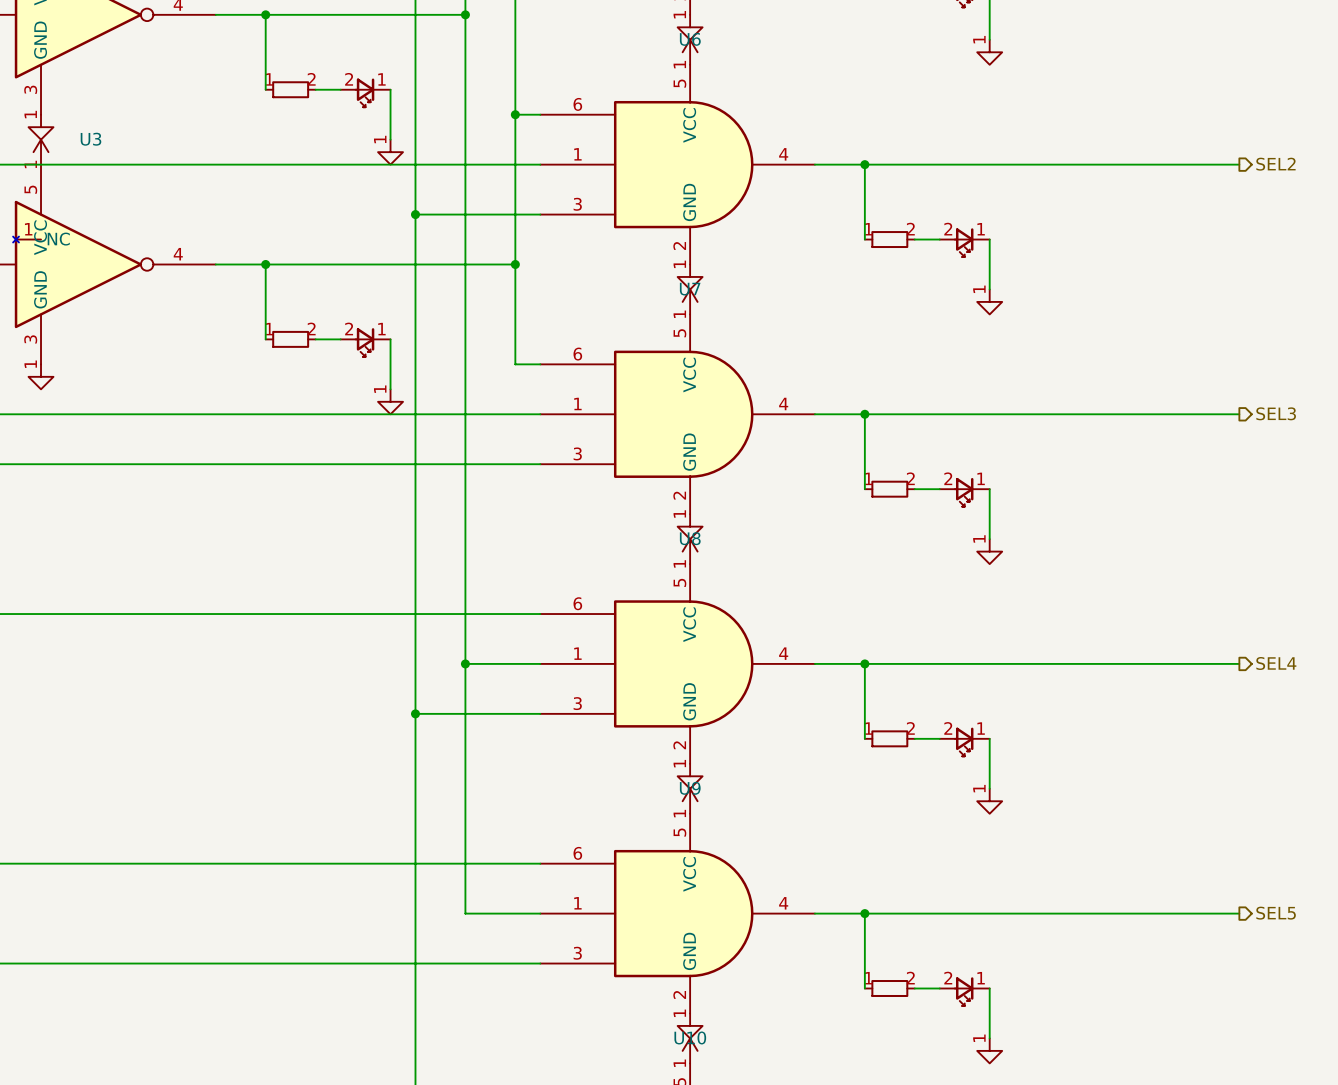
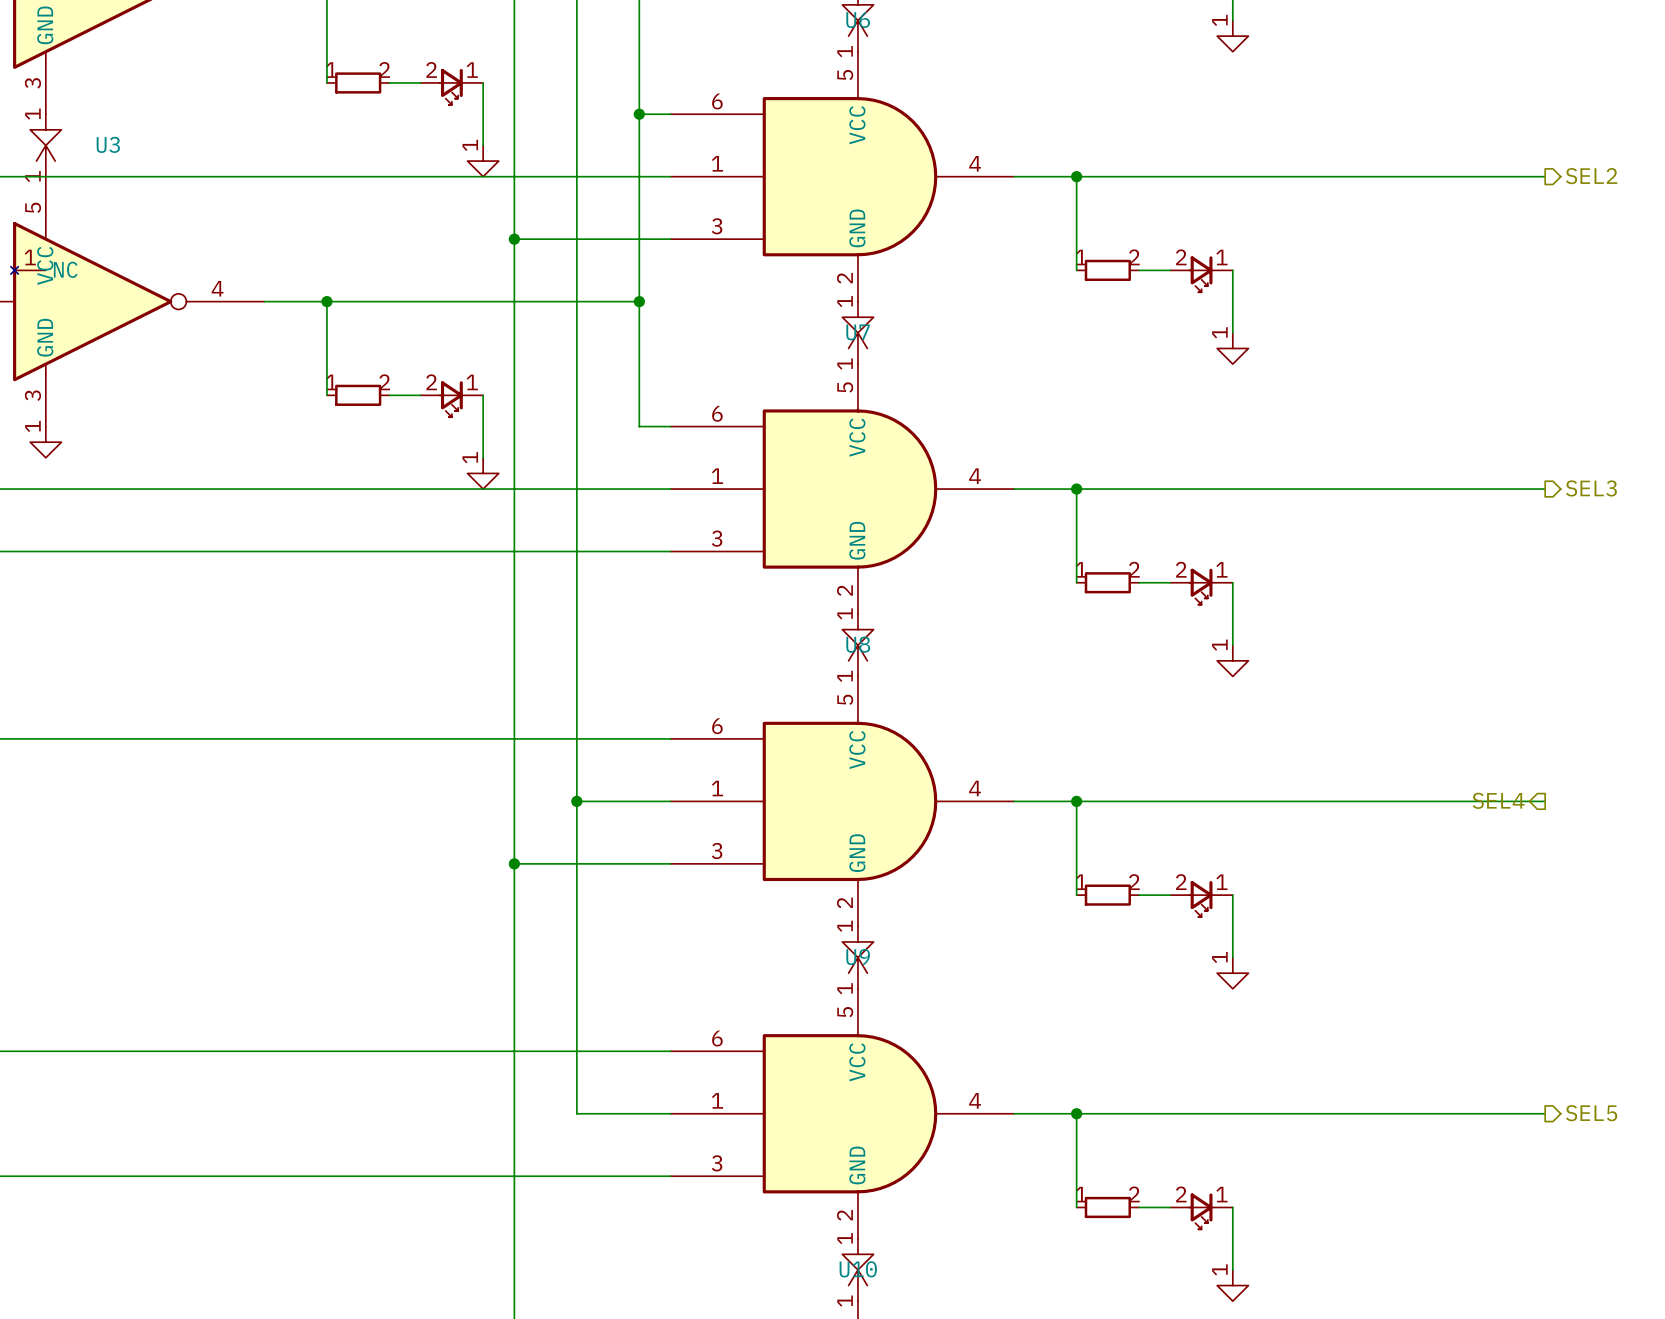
hierarchical label rotation: 0° (1276, 663) -> 180° (1498, 800)
hierarchical label position: SEL4 (1276, 663) -> SEL4 (1498, 800)

